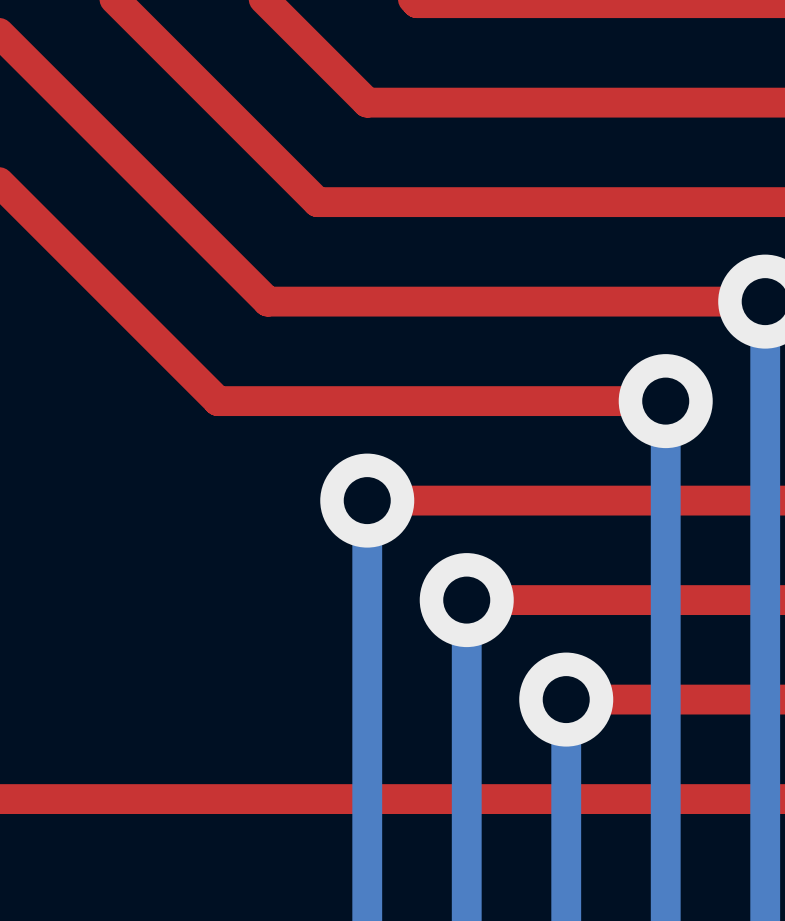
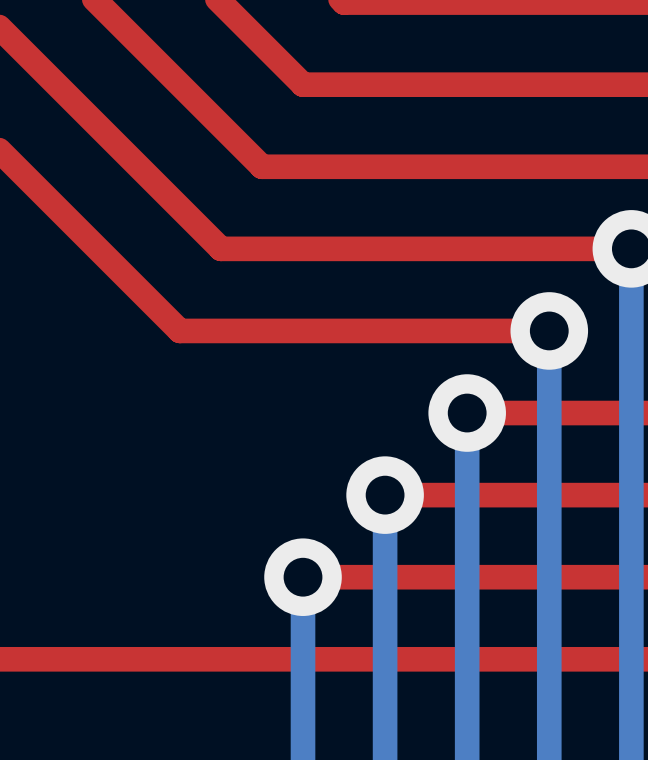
bottom track: (367, 500) (367, 699) -> (467, 413) (467, 577)
via: (367, 500) -> none
top track: (566, 500) (367, 500) -> (467, 577) (303, 577)
via: none -> (467, 413)
via: none -> (303, 577)
via: (566, 699) -> none

